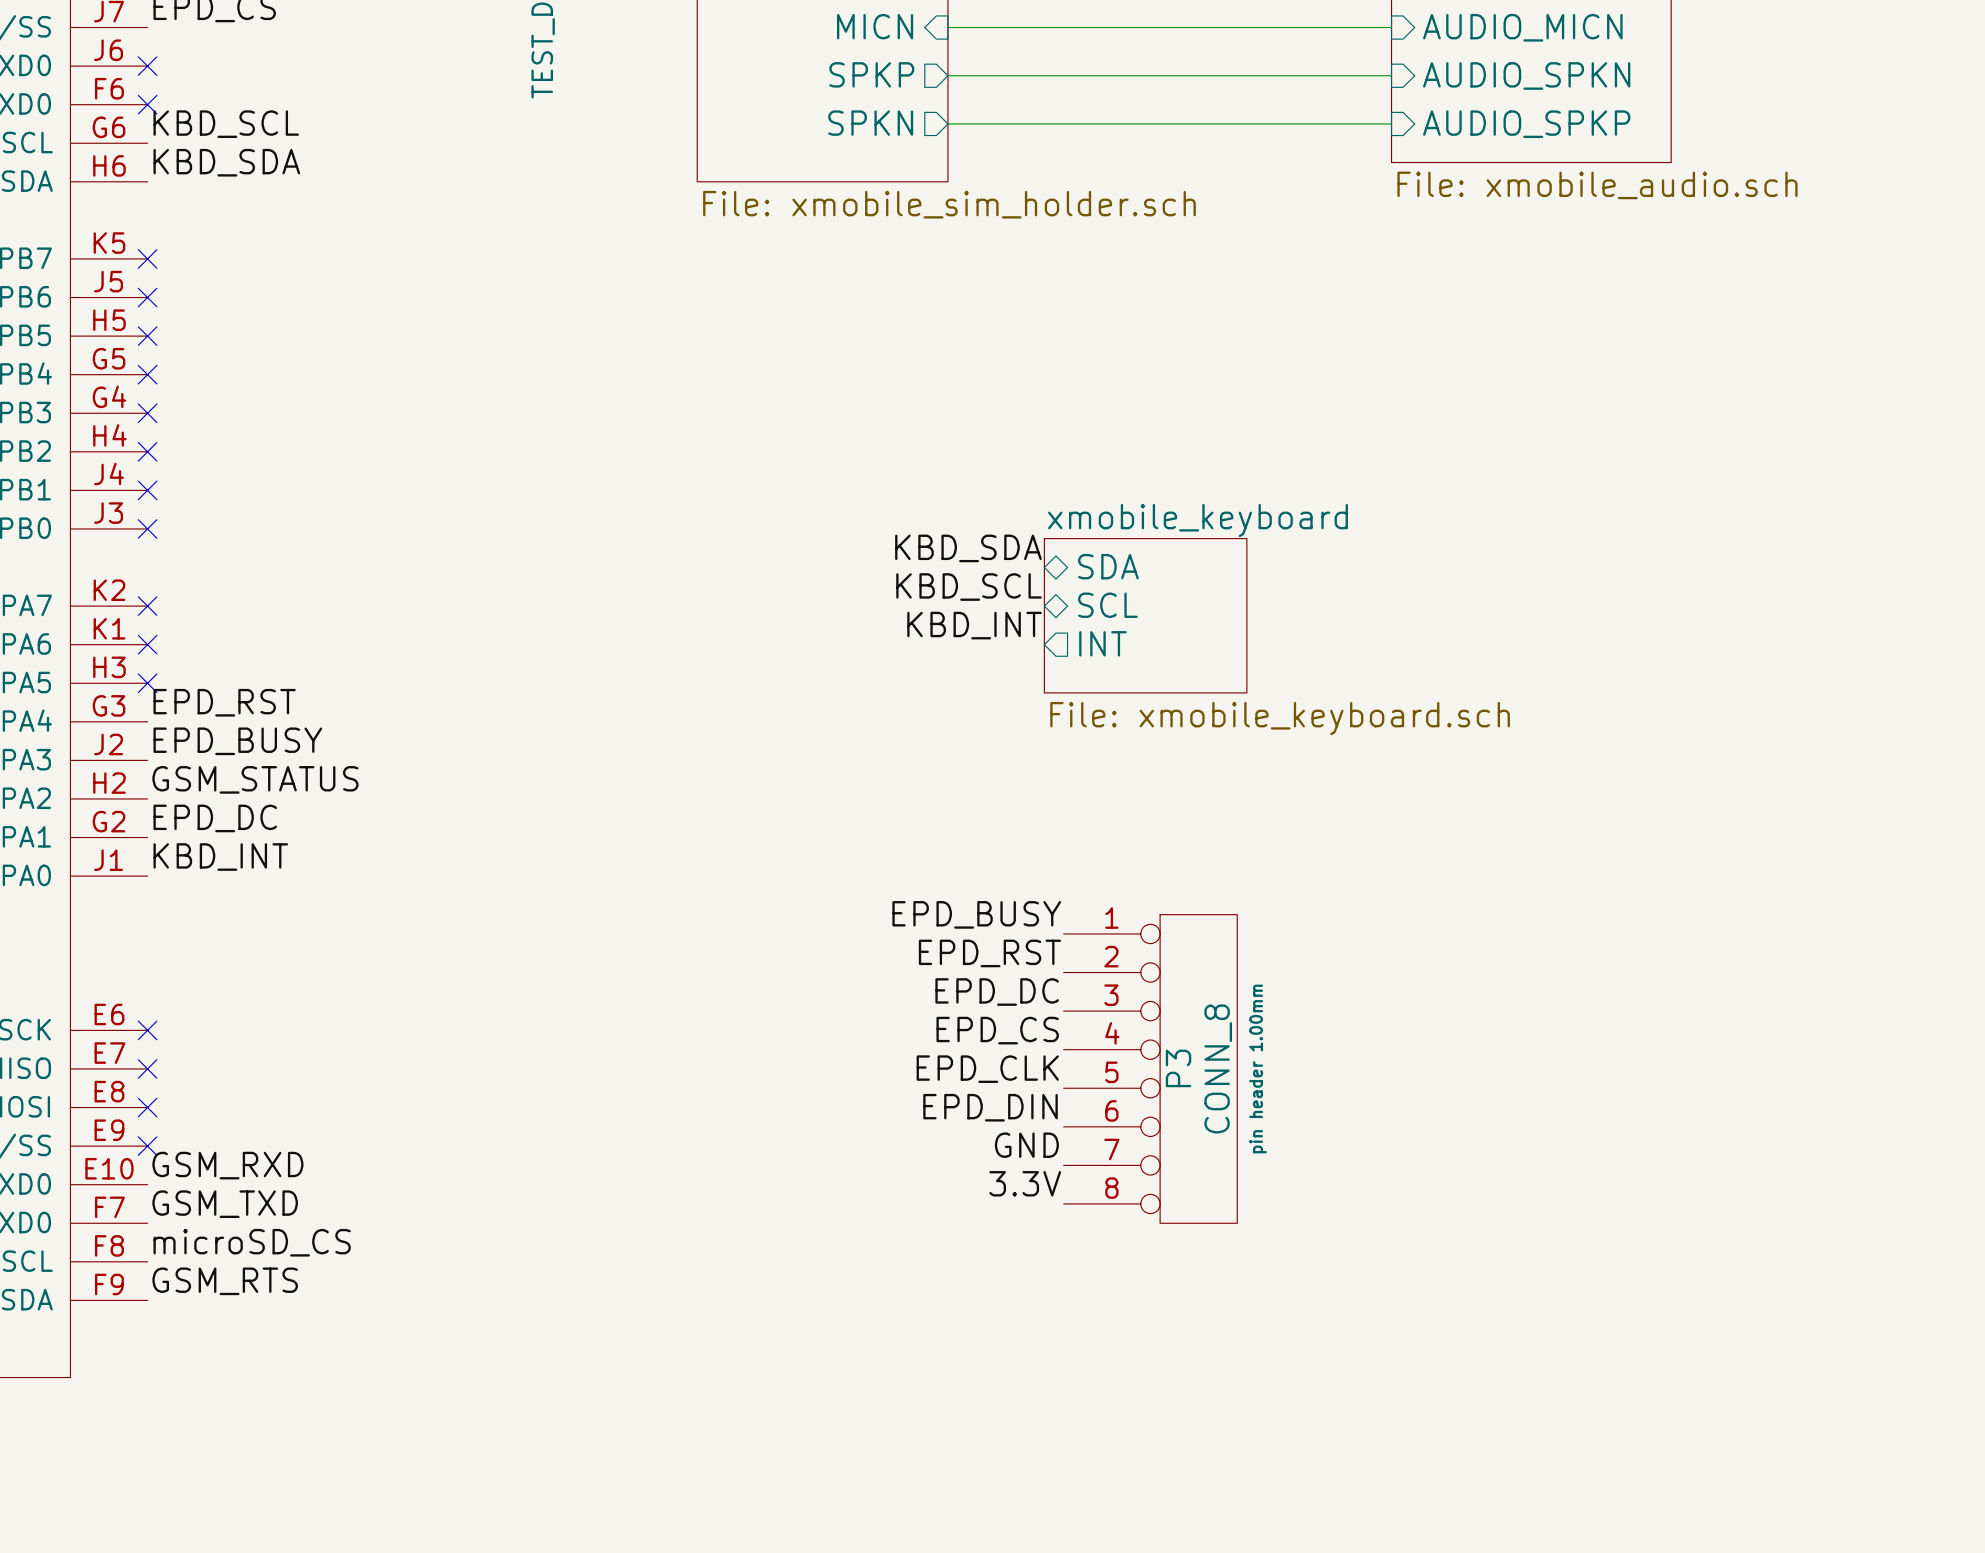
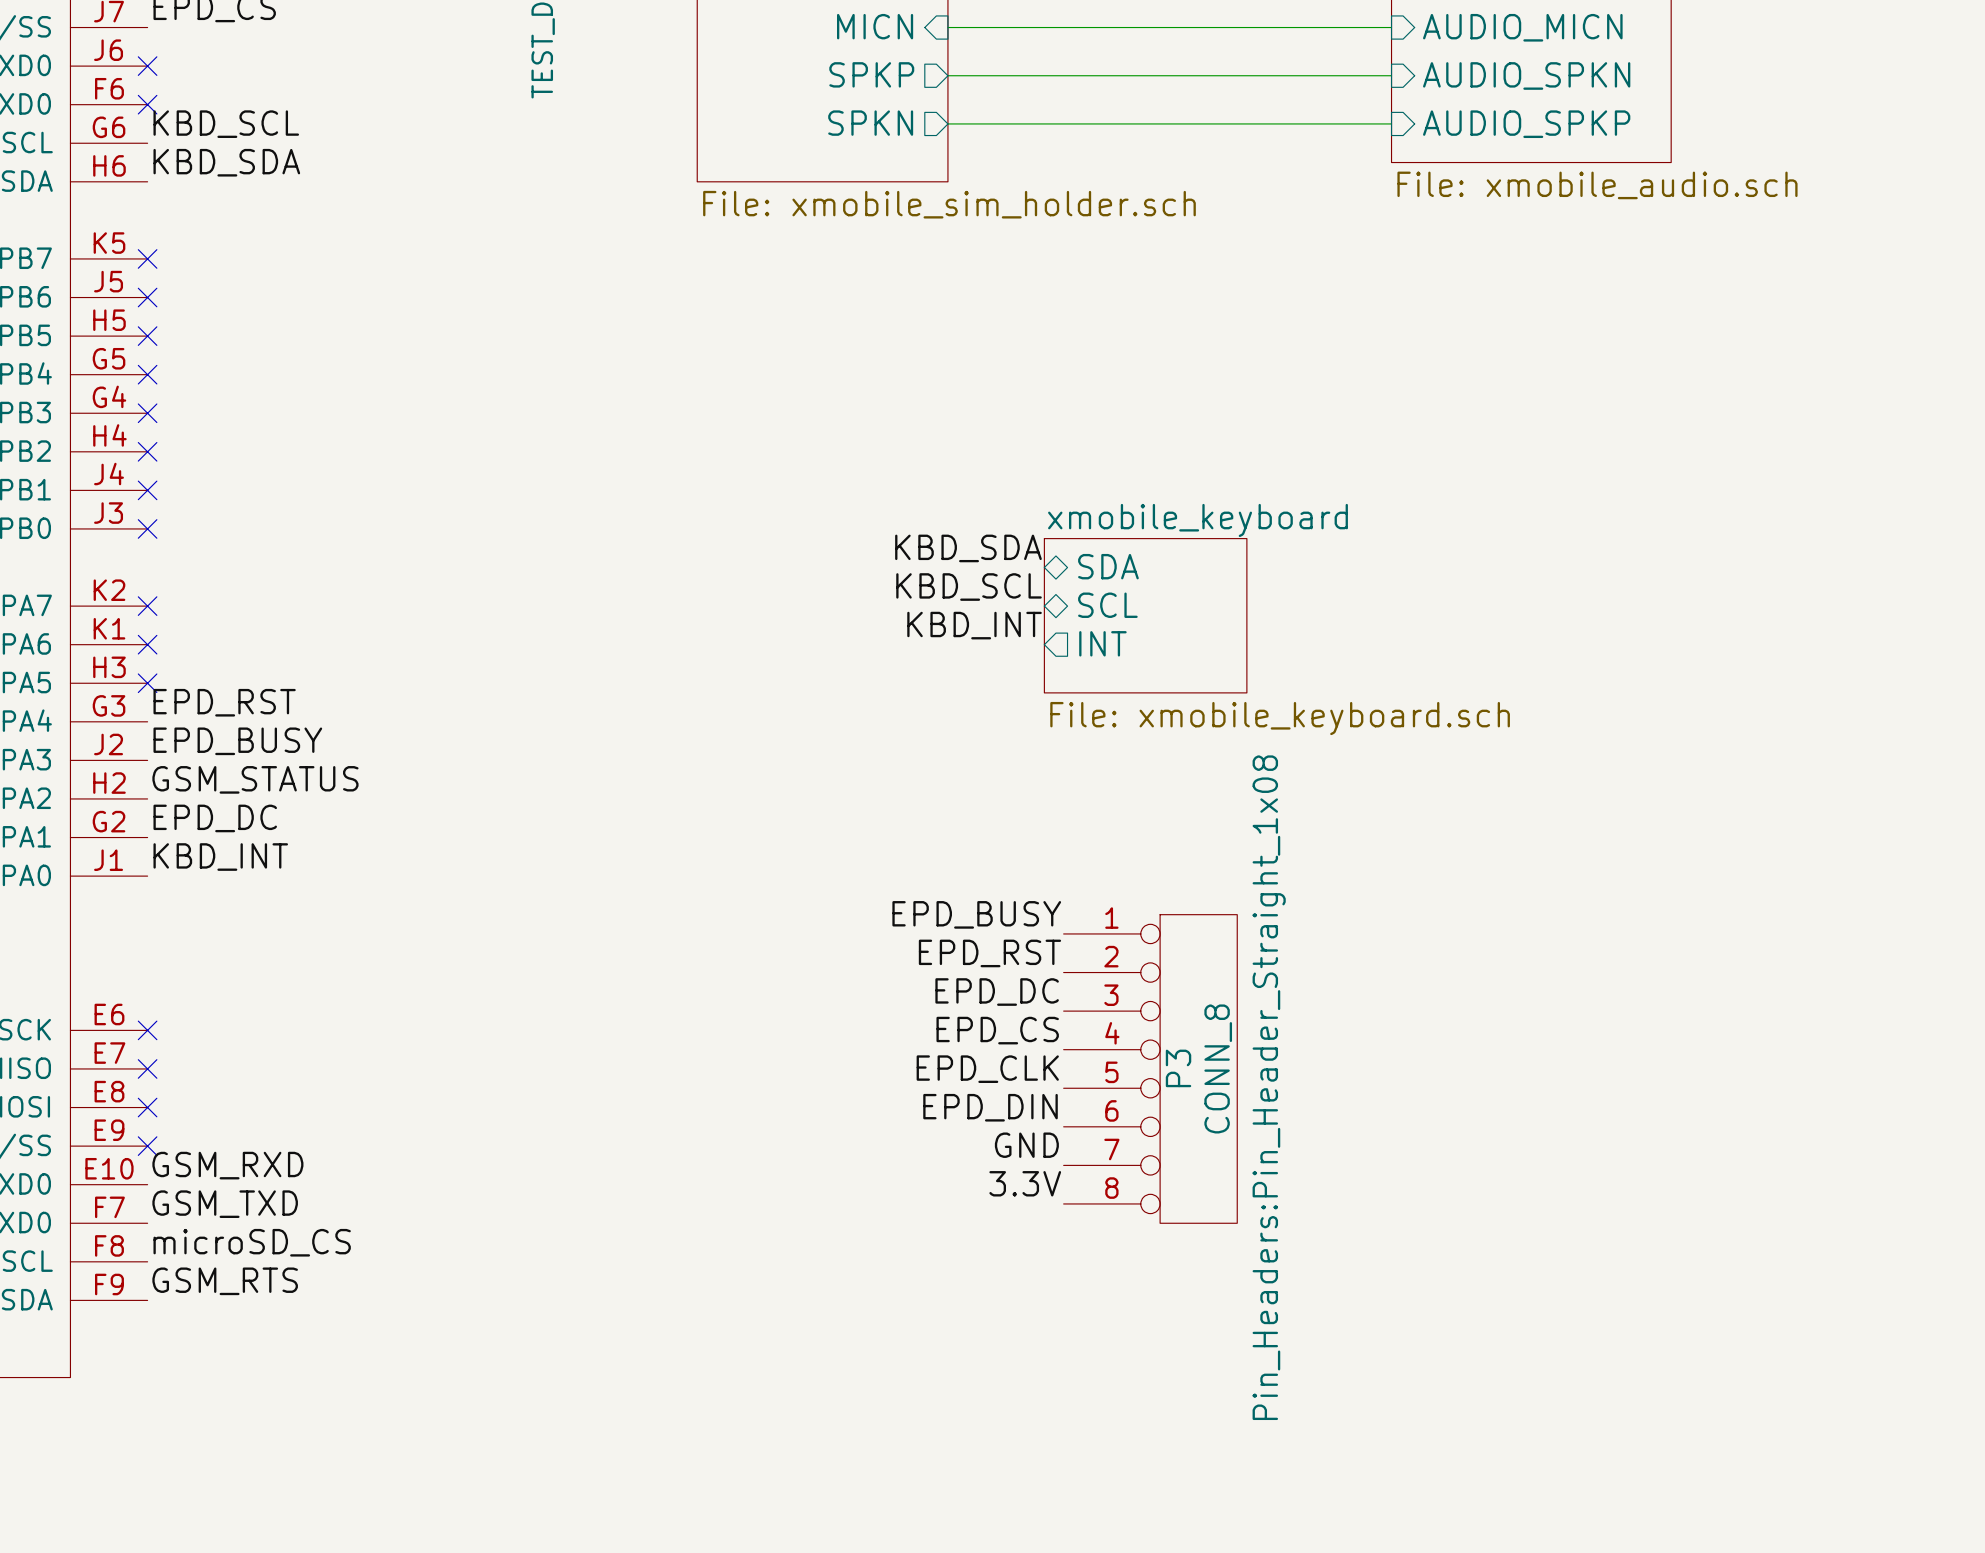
P3 text: pin header 1.00mm (1258, 1068) -> none
P3 text: none -> Pin_Headers:Pin_Header_Straight_1x08 (1269, 1087)

